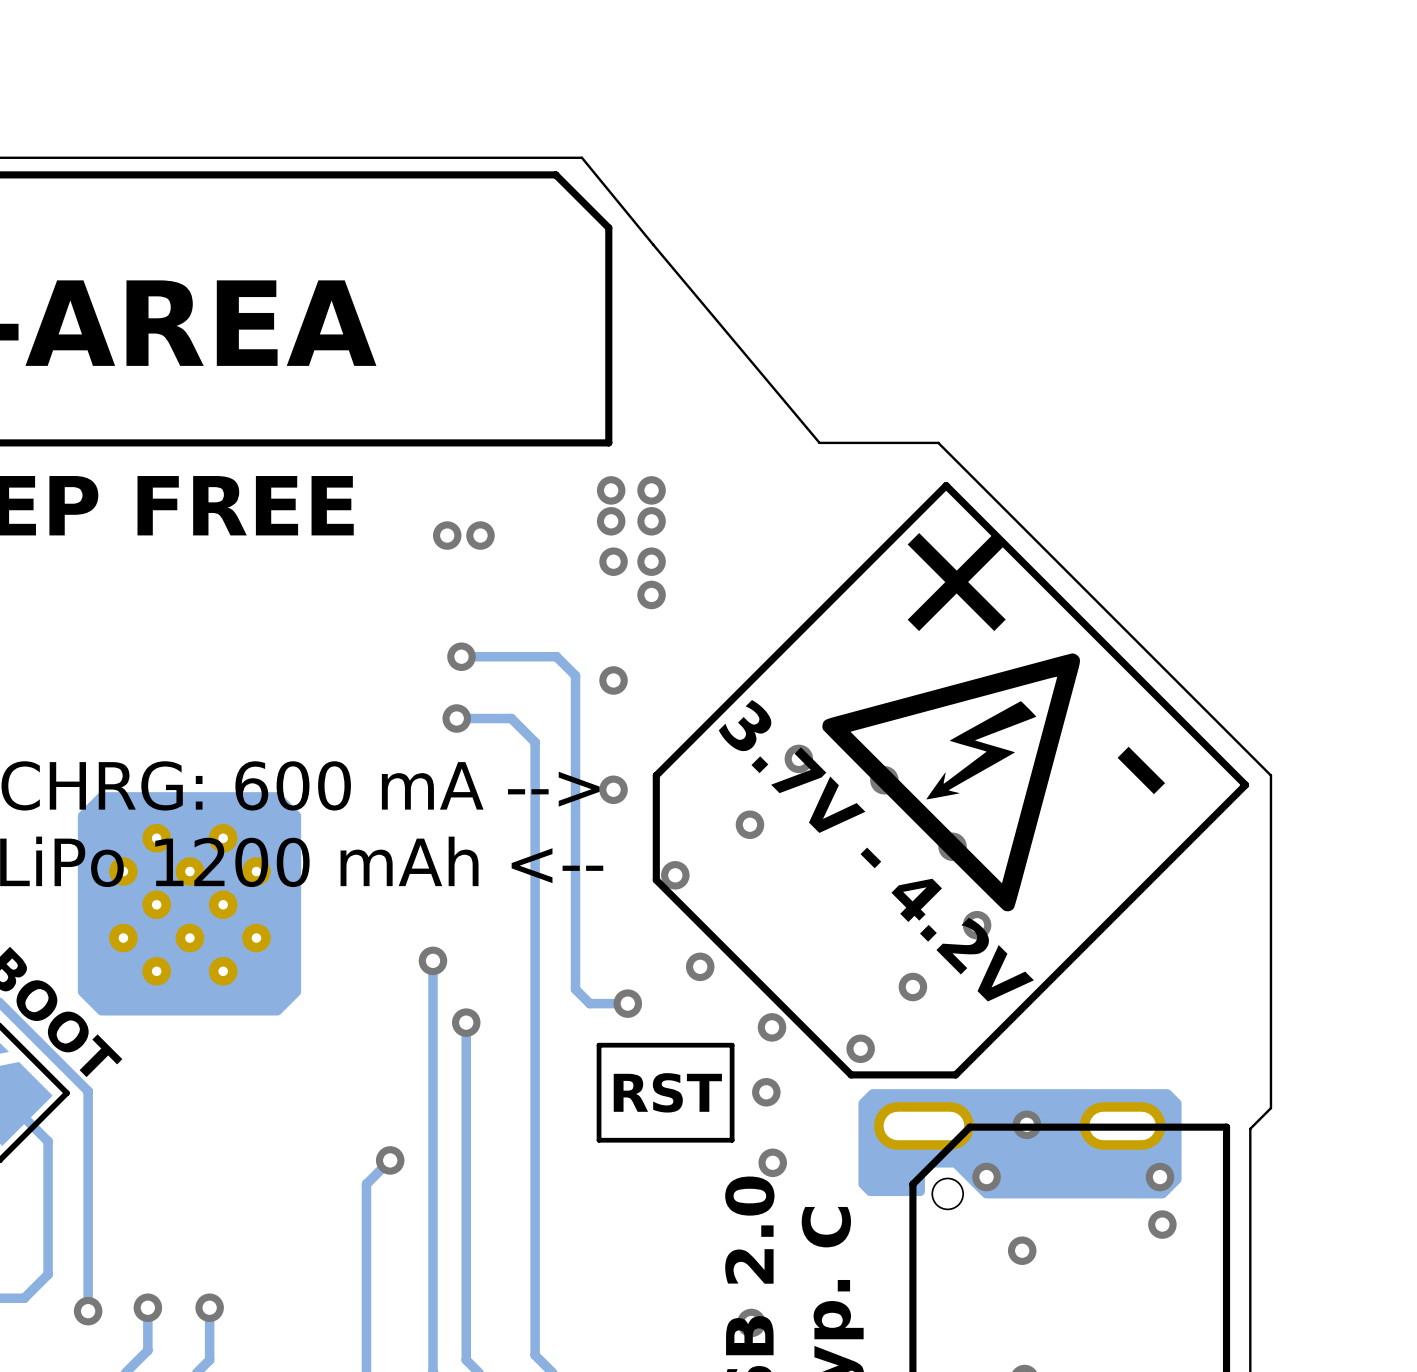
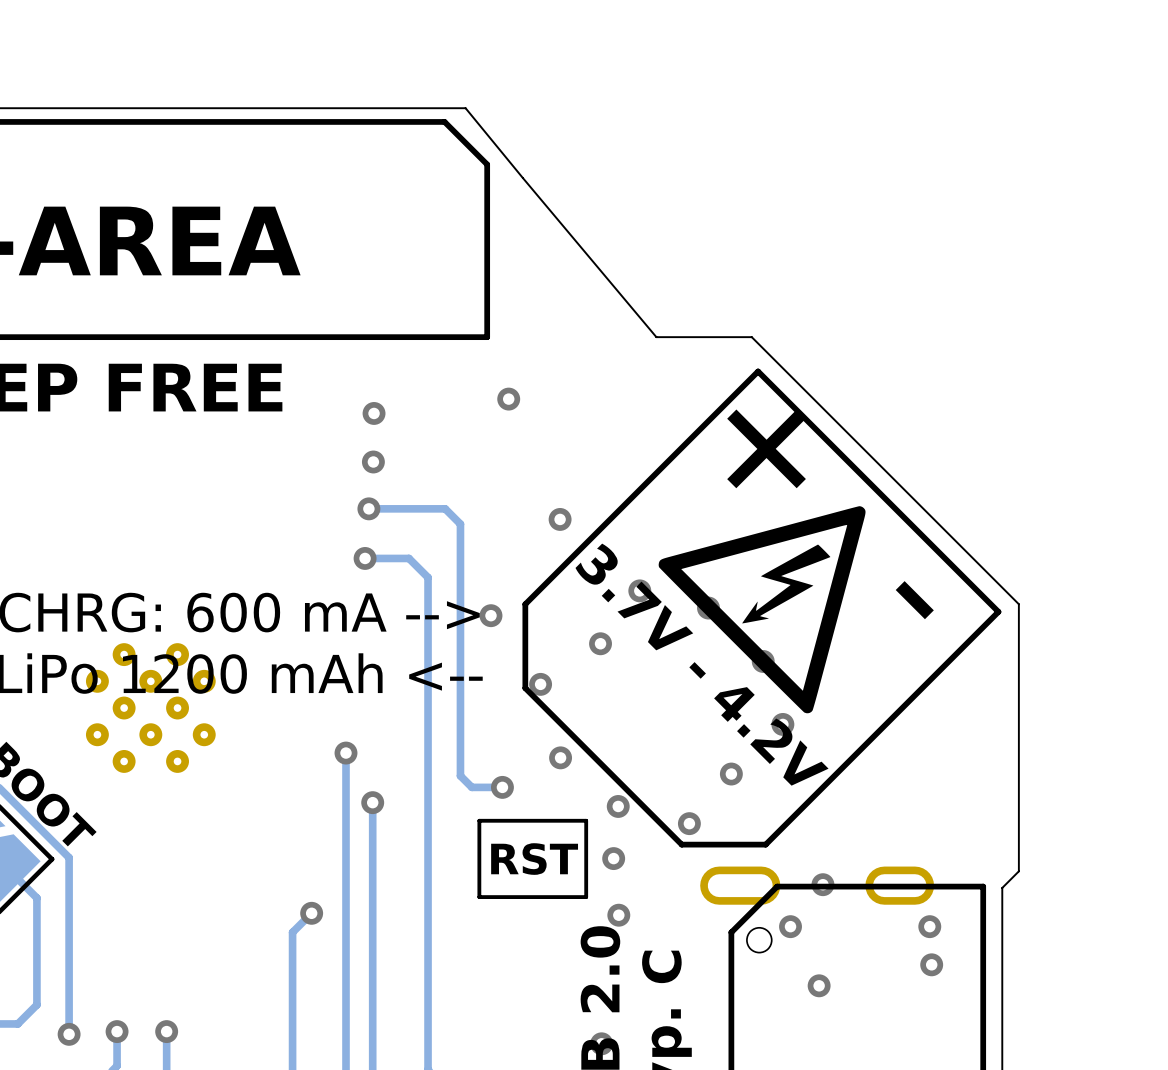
via: (611, 490) -> none
via: (651, 490) -> none
via: none -> (508, 399)
via: (611, 521) -> none
via: (651, 521) -> none
via: (447, 535) -> none
via: (480, 535) -> none
via: none -> (374, 413)
via: (613, 561) -> none
via: (651, 561) -> none
via: (651, 594) -> none
via: none -> (373, 461)
via: none -> (560, 519)
via: (613, 680) -> none
drawing: [77, 792, 302, 1016] -> none
drawing: [858, 1089, 1182, 1199] -> none

